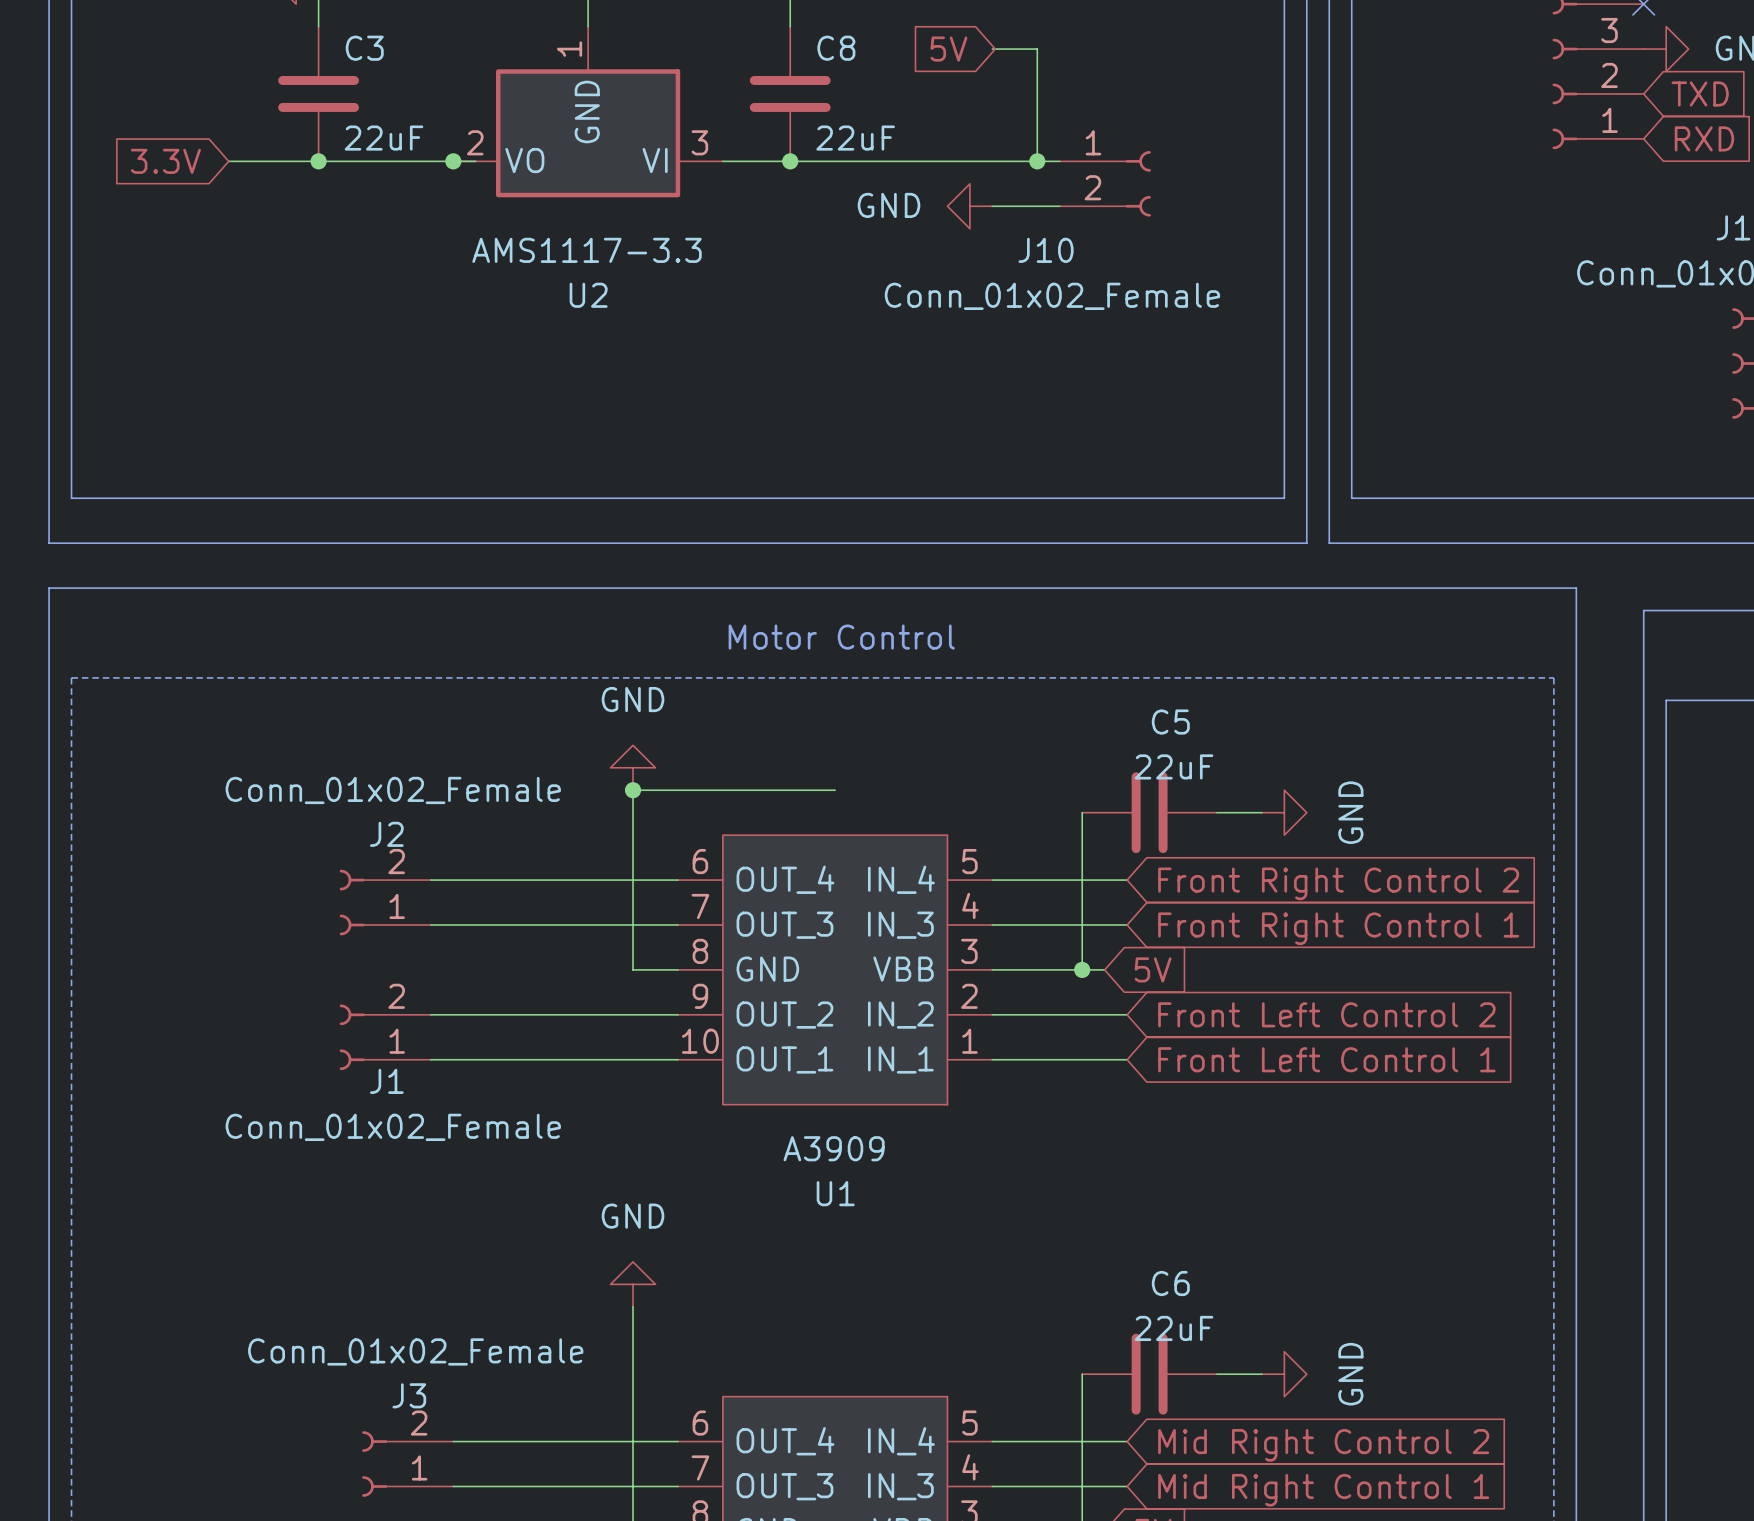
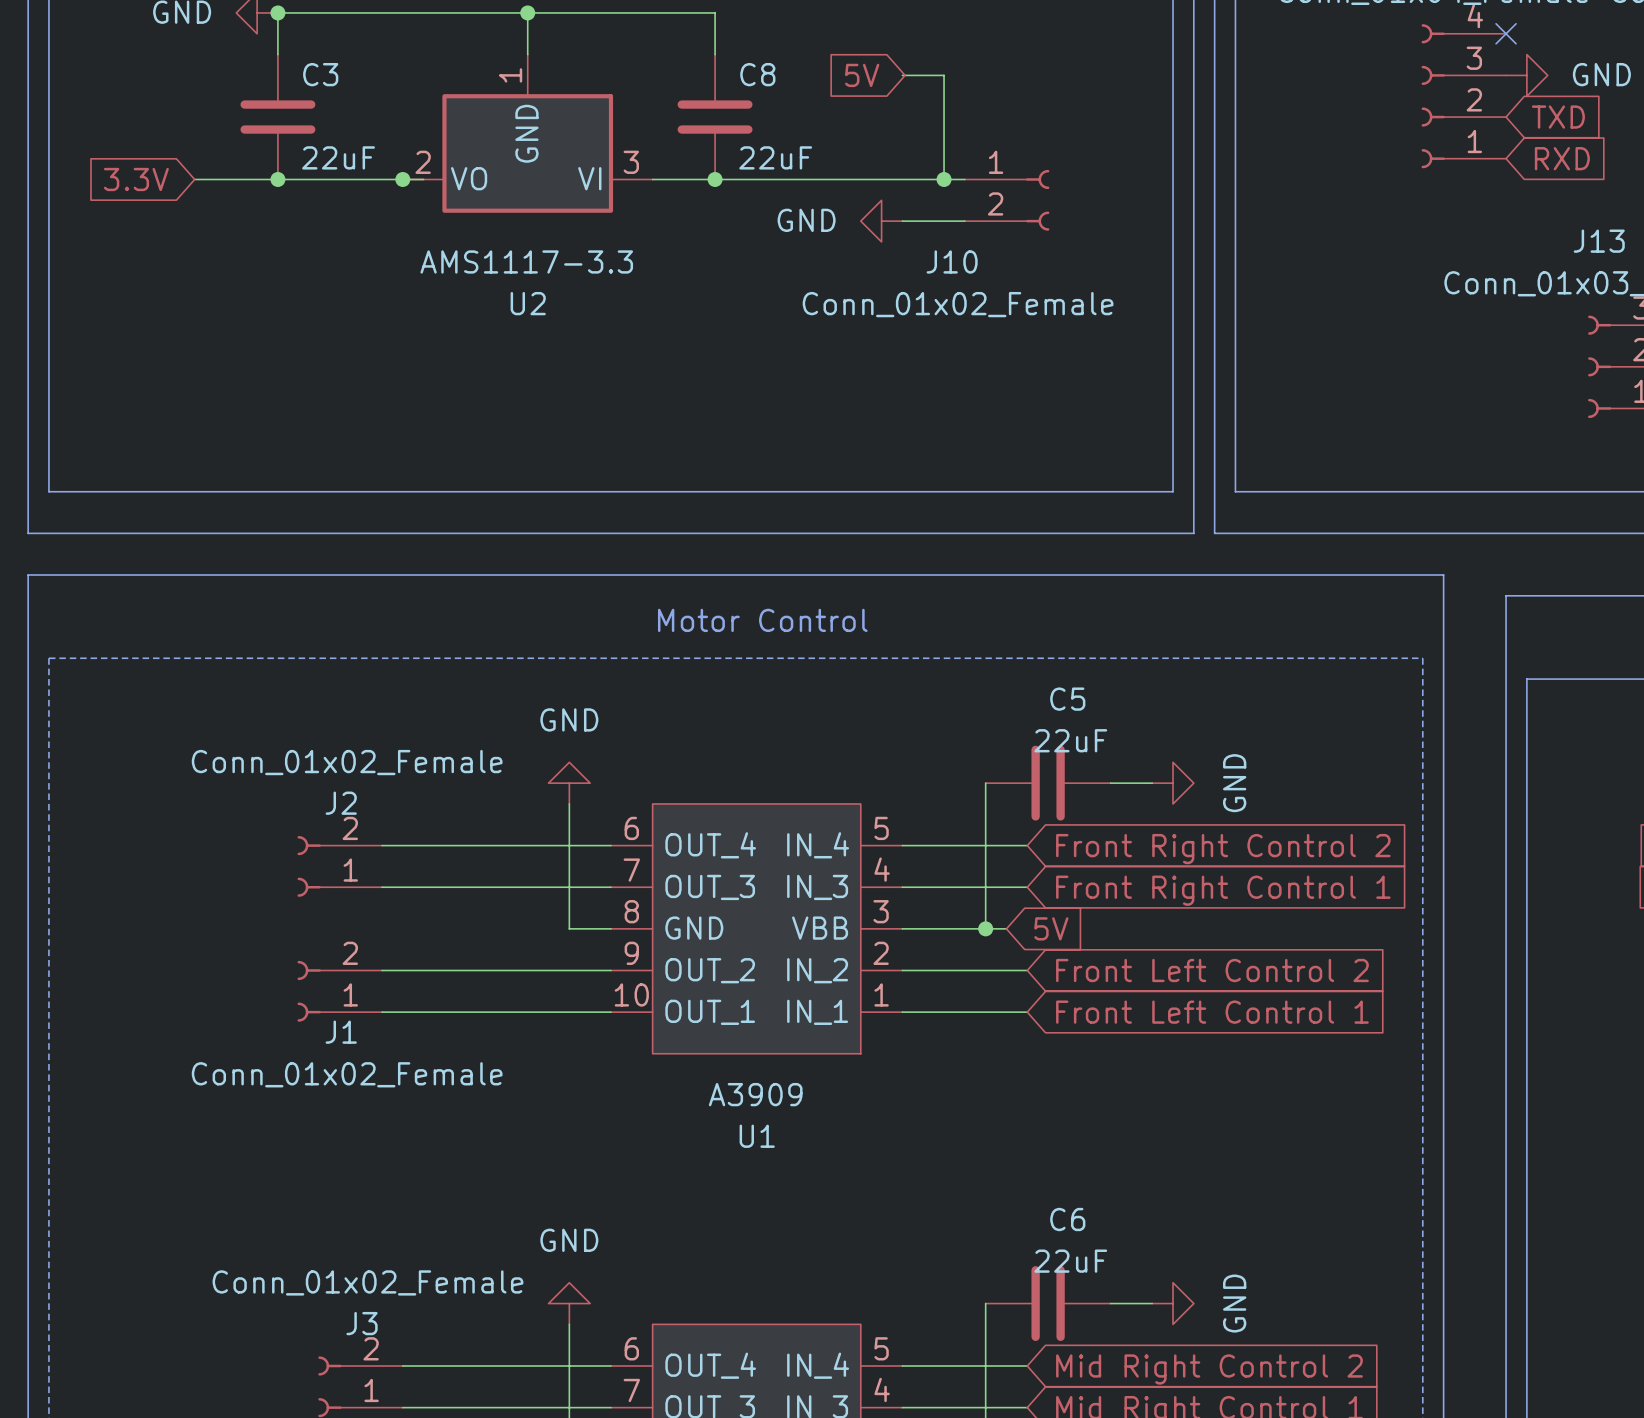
power symbol position: GND (633, 767) -> GND (569, 783)
junction: (633, 790) -> none
wire: (835, 790) (633, 790) (633, 835) -> none
power symbol position: GND (633, 1284) -> GND (569, 1303)
wire: (633, 1306) (633, 1396) -> none

